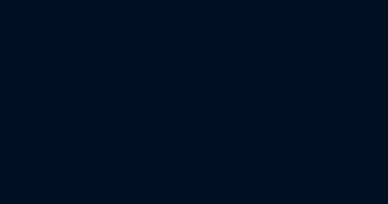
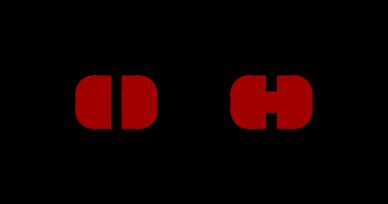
part: none -> (116, 102)
part: none -> (271, 102)

